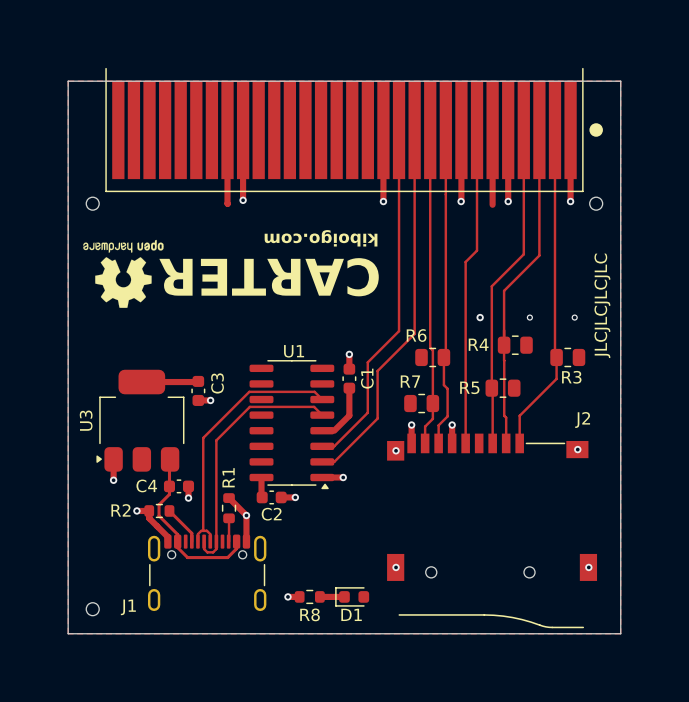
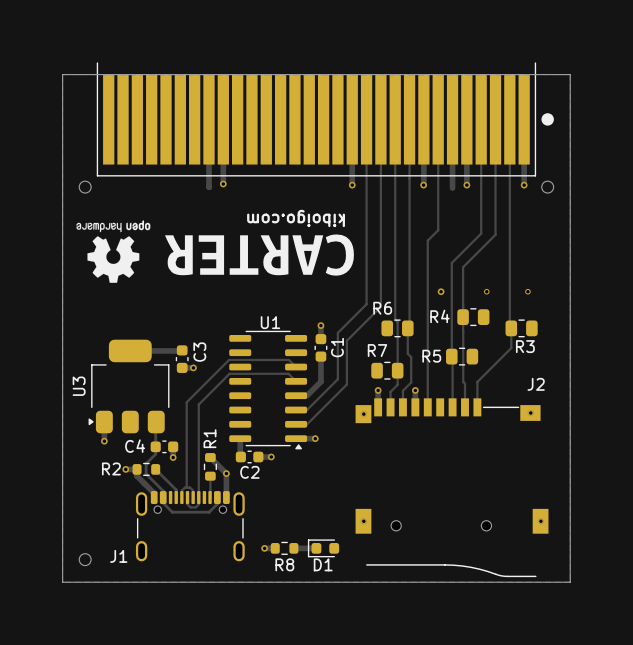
drawing: none -> [165, 234, 354, 276]
text: CARTER (269, 277) -> none
text: JLCJLCJLCJLC (602, 305) -> none

